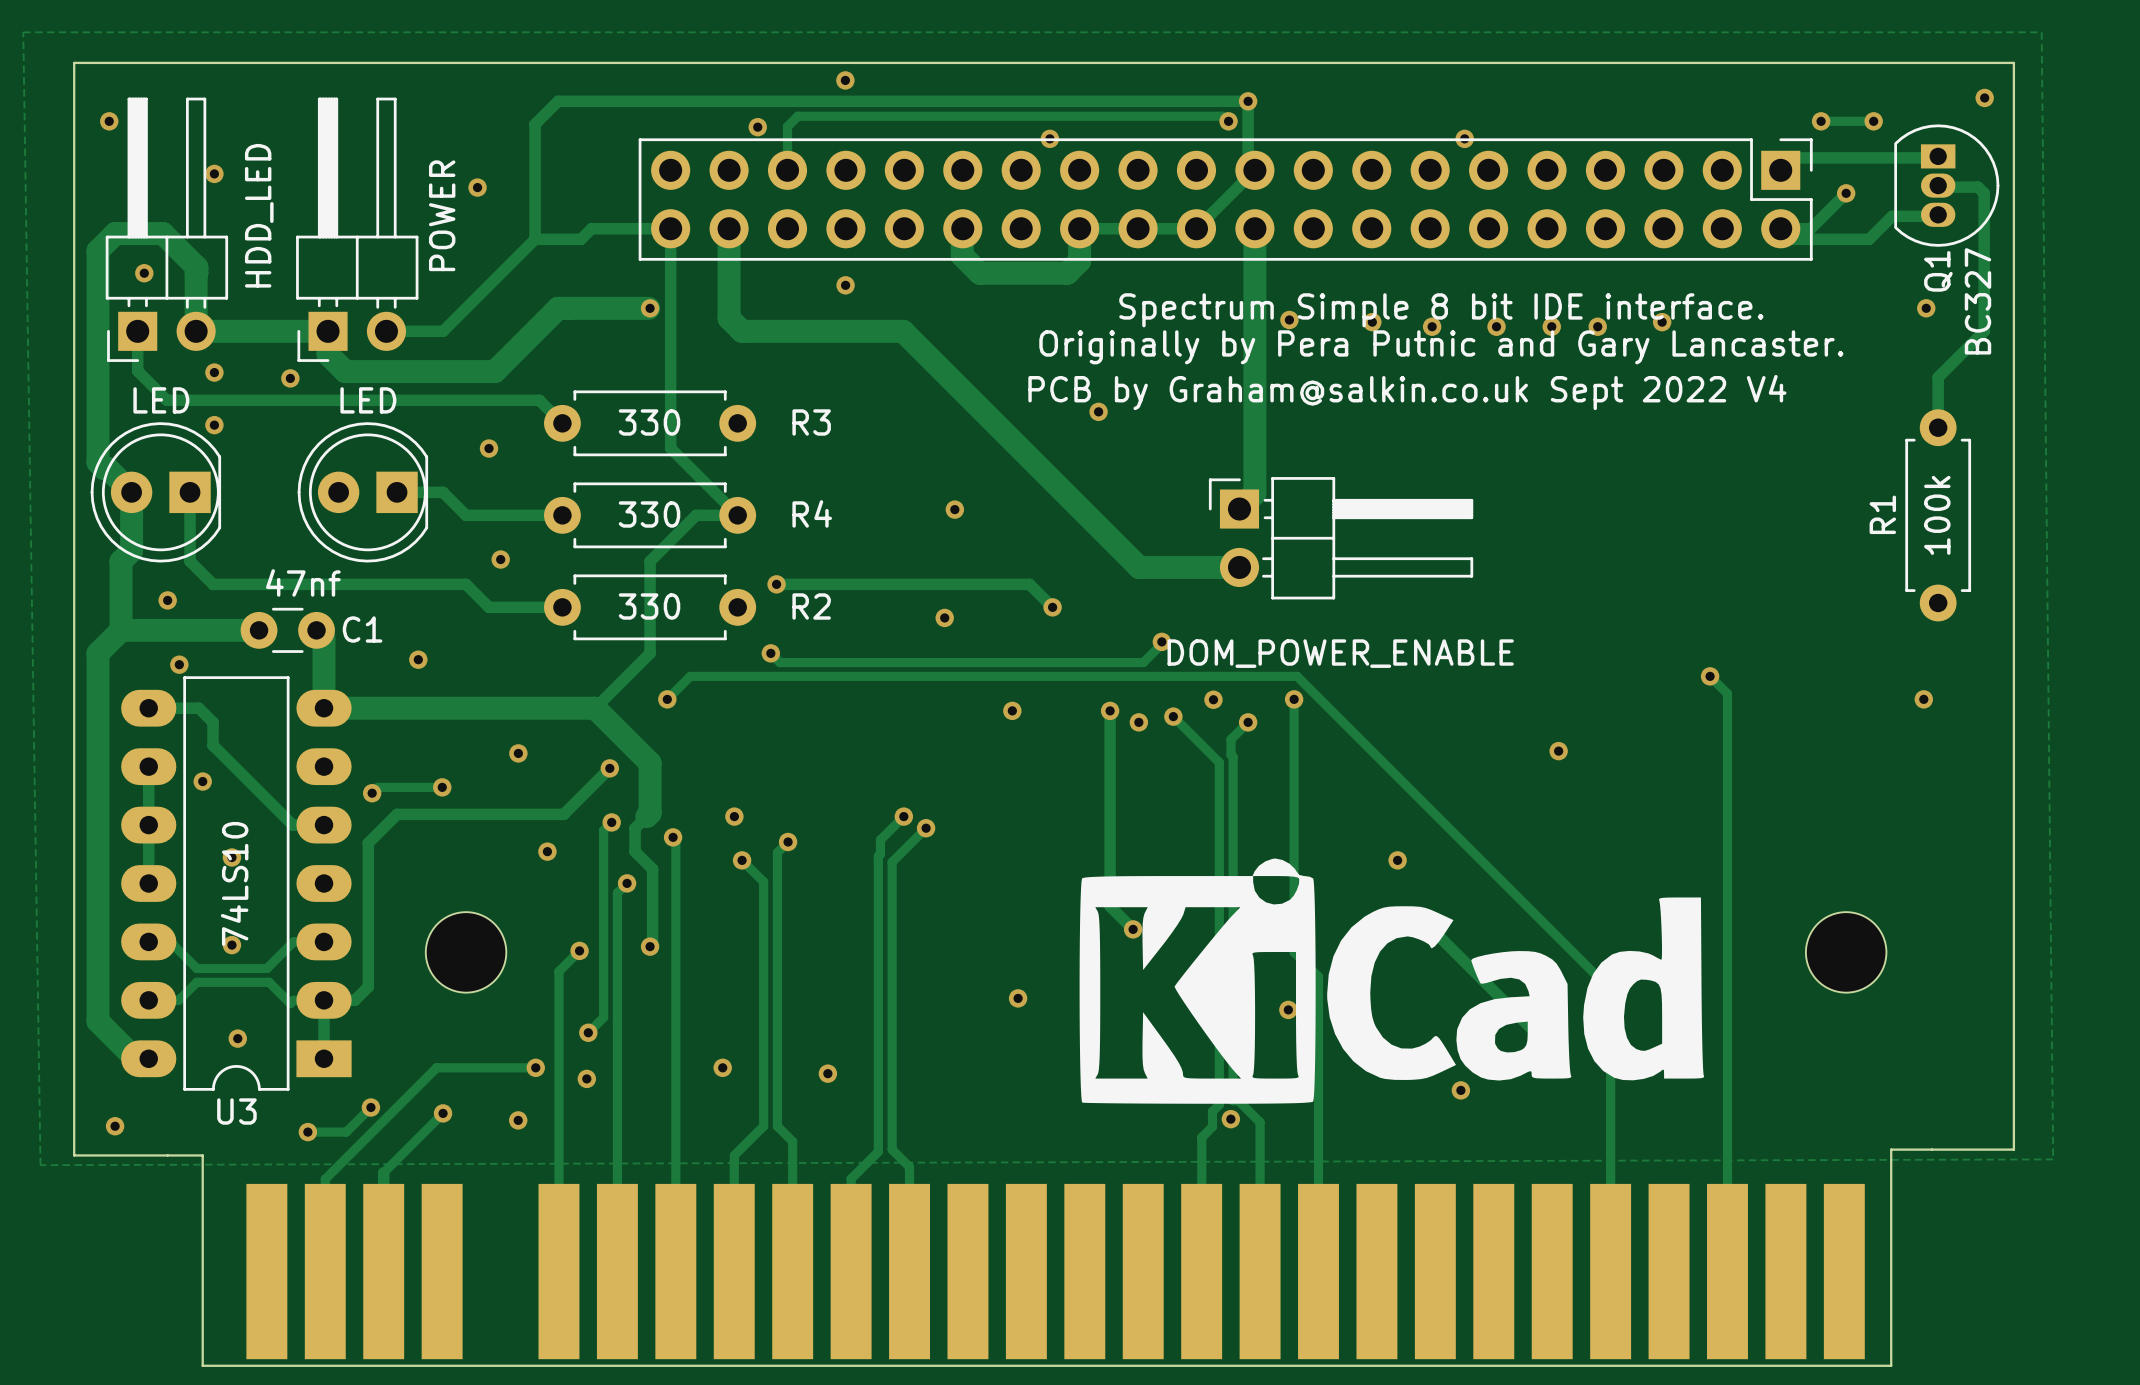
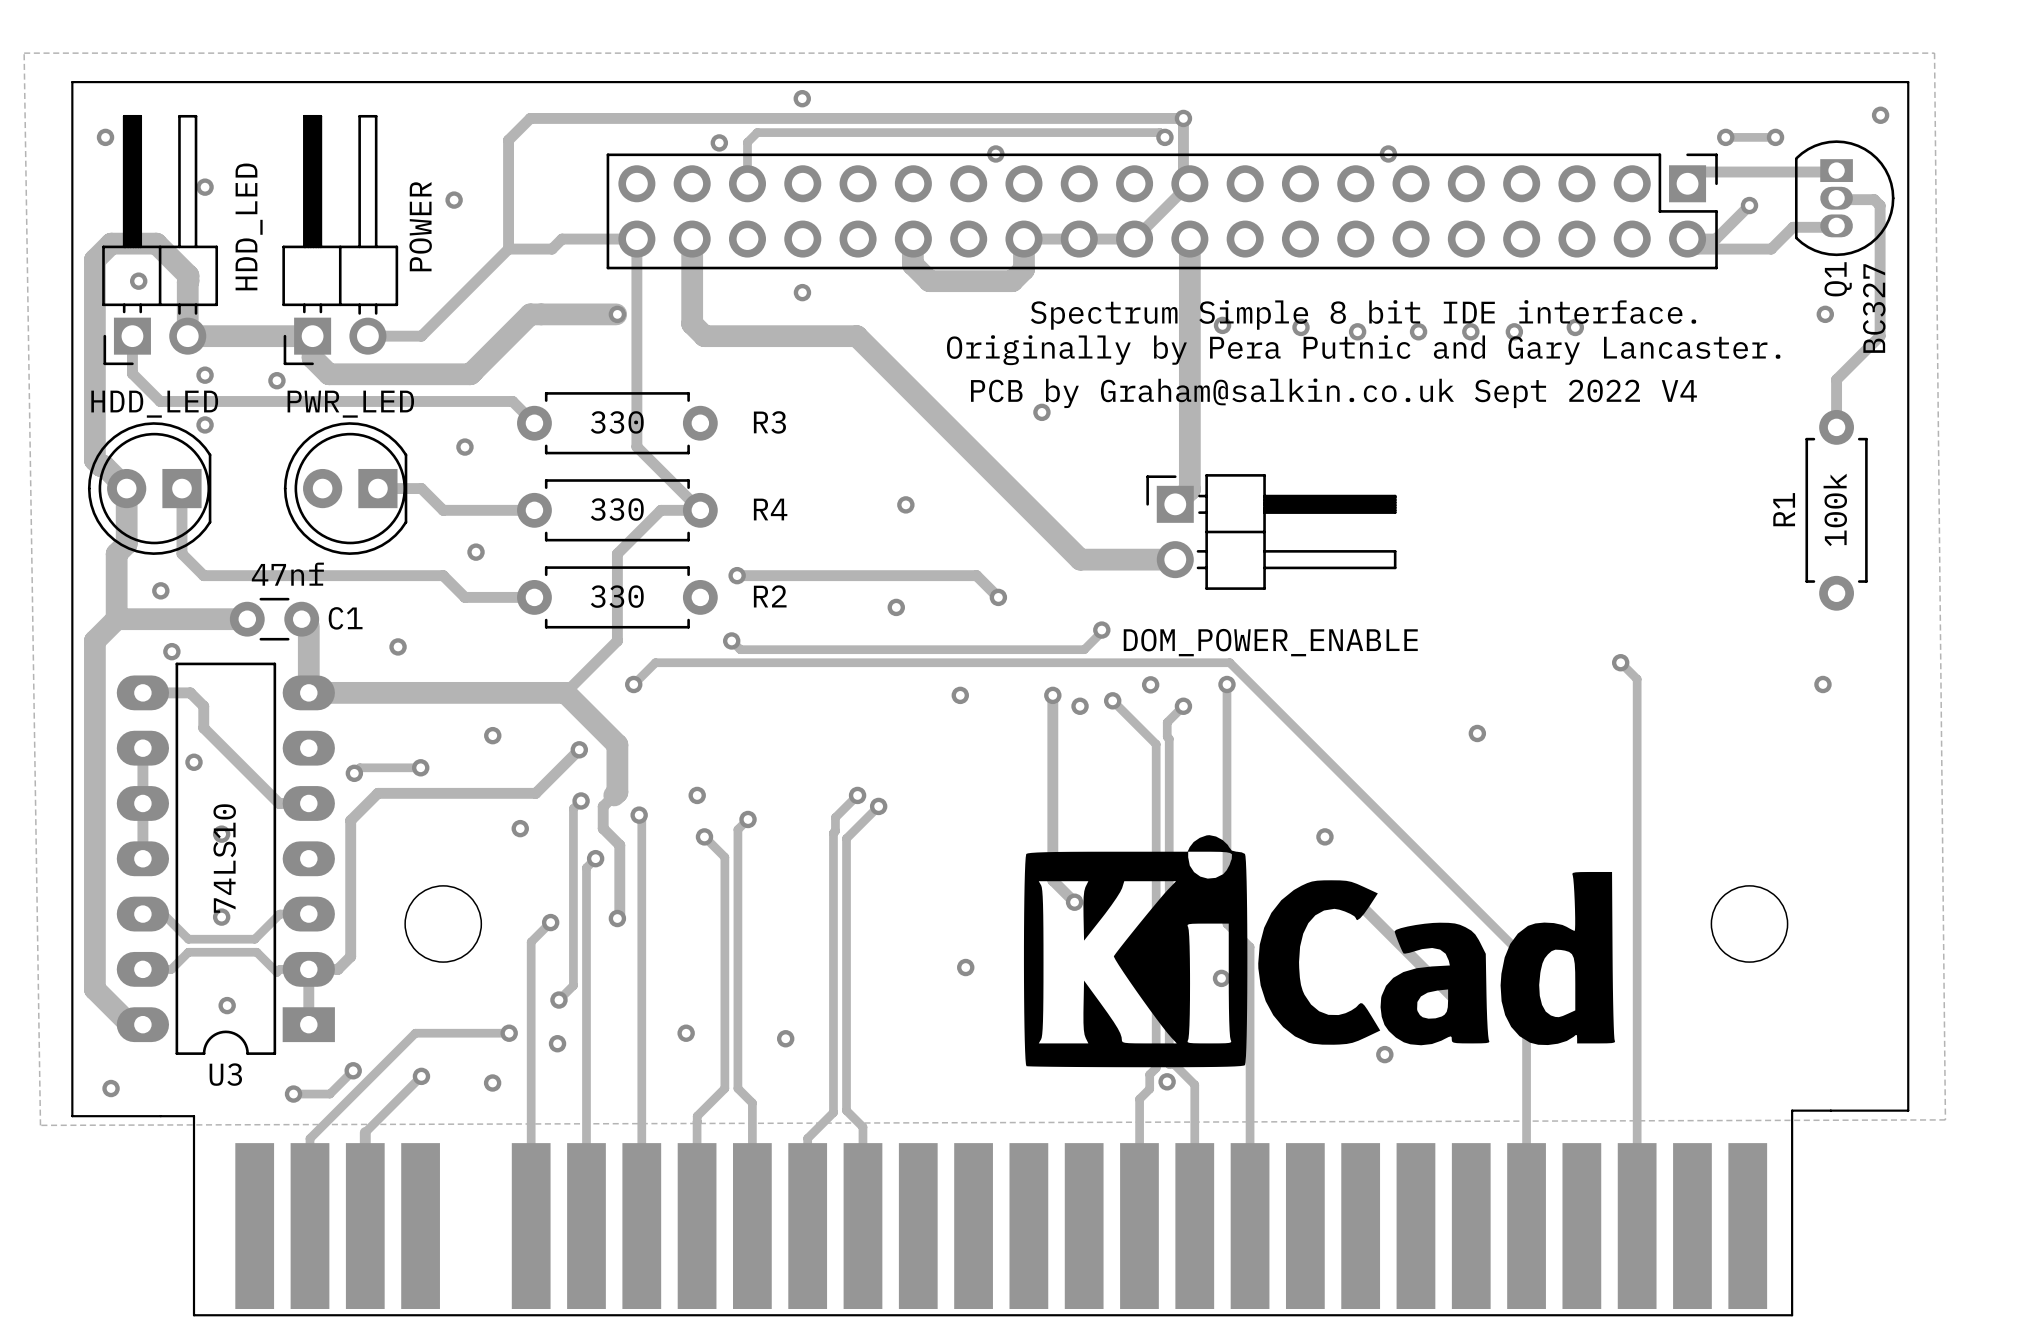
part value: LED (161, 400) -> HDD_LED (154, 404)
part value: LED (368, 400) -> PWR_LED (350, 404)

